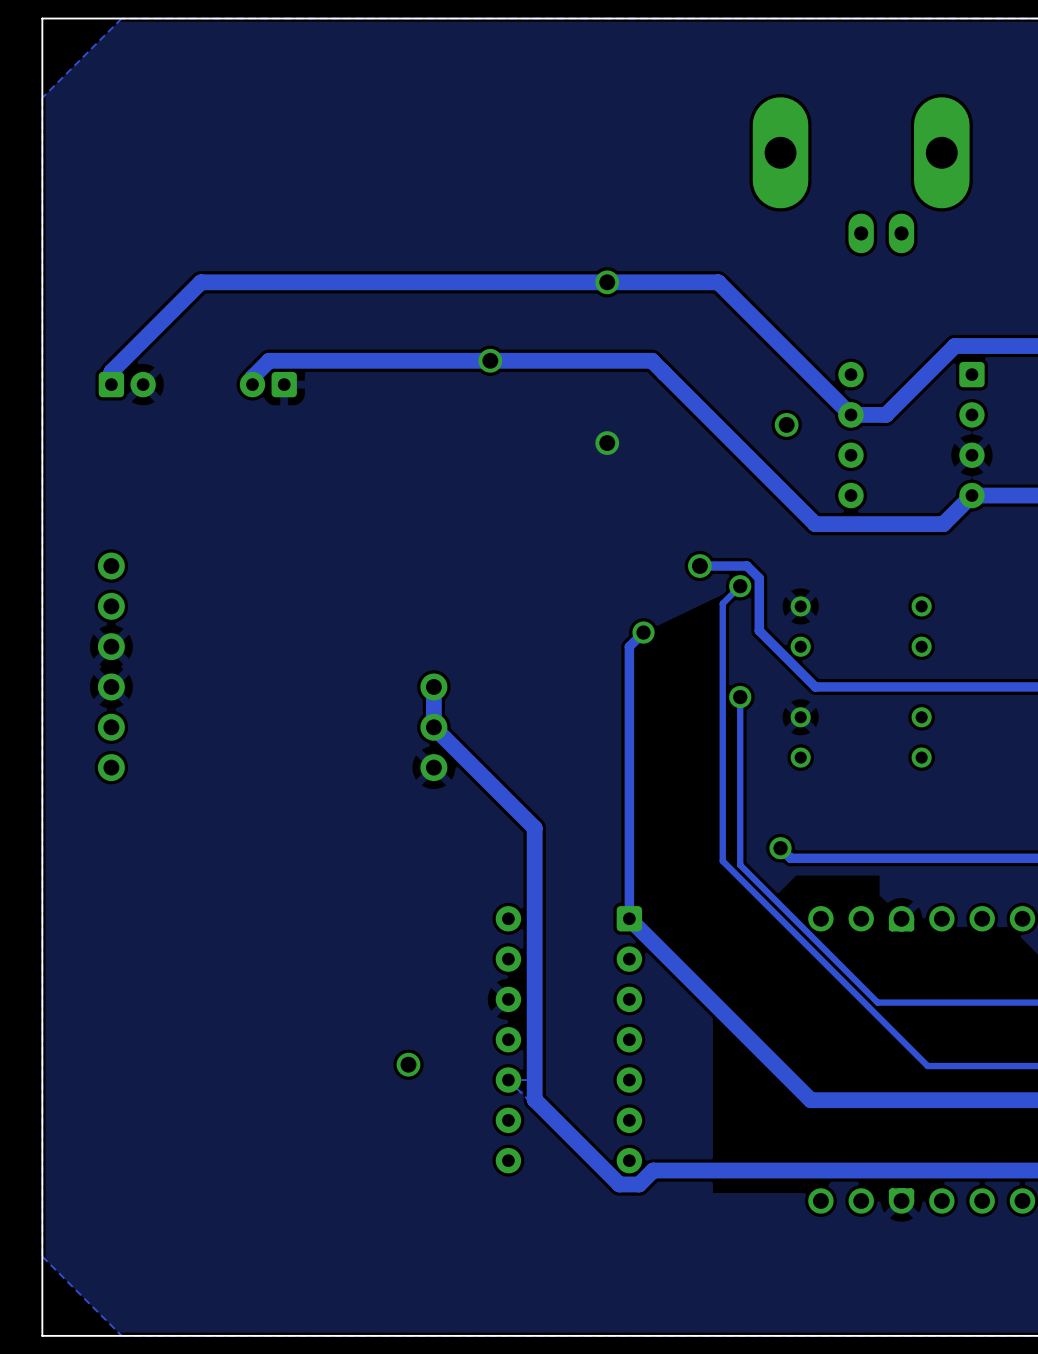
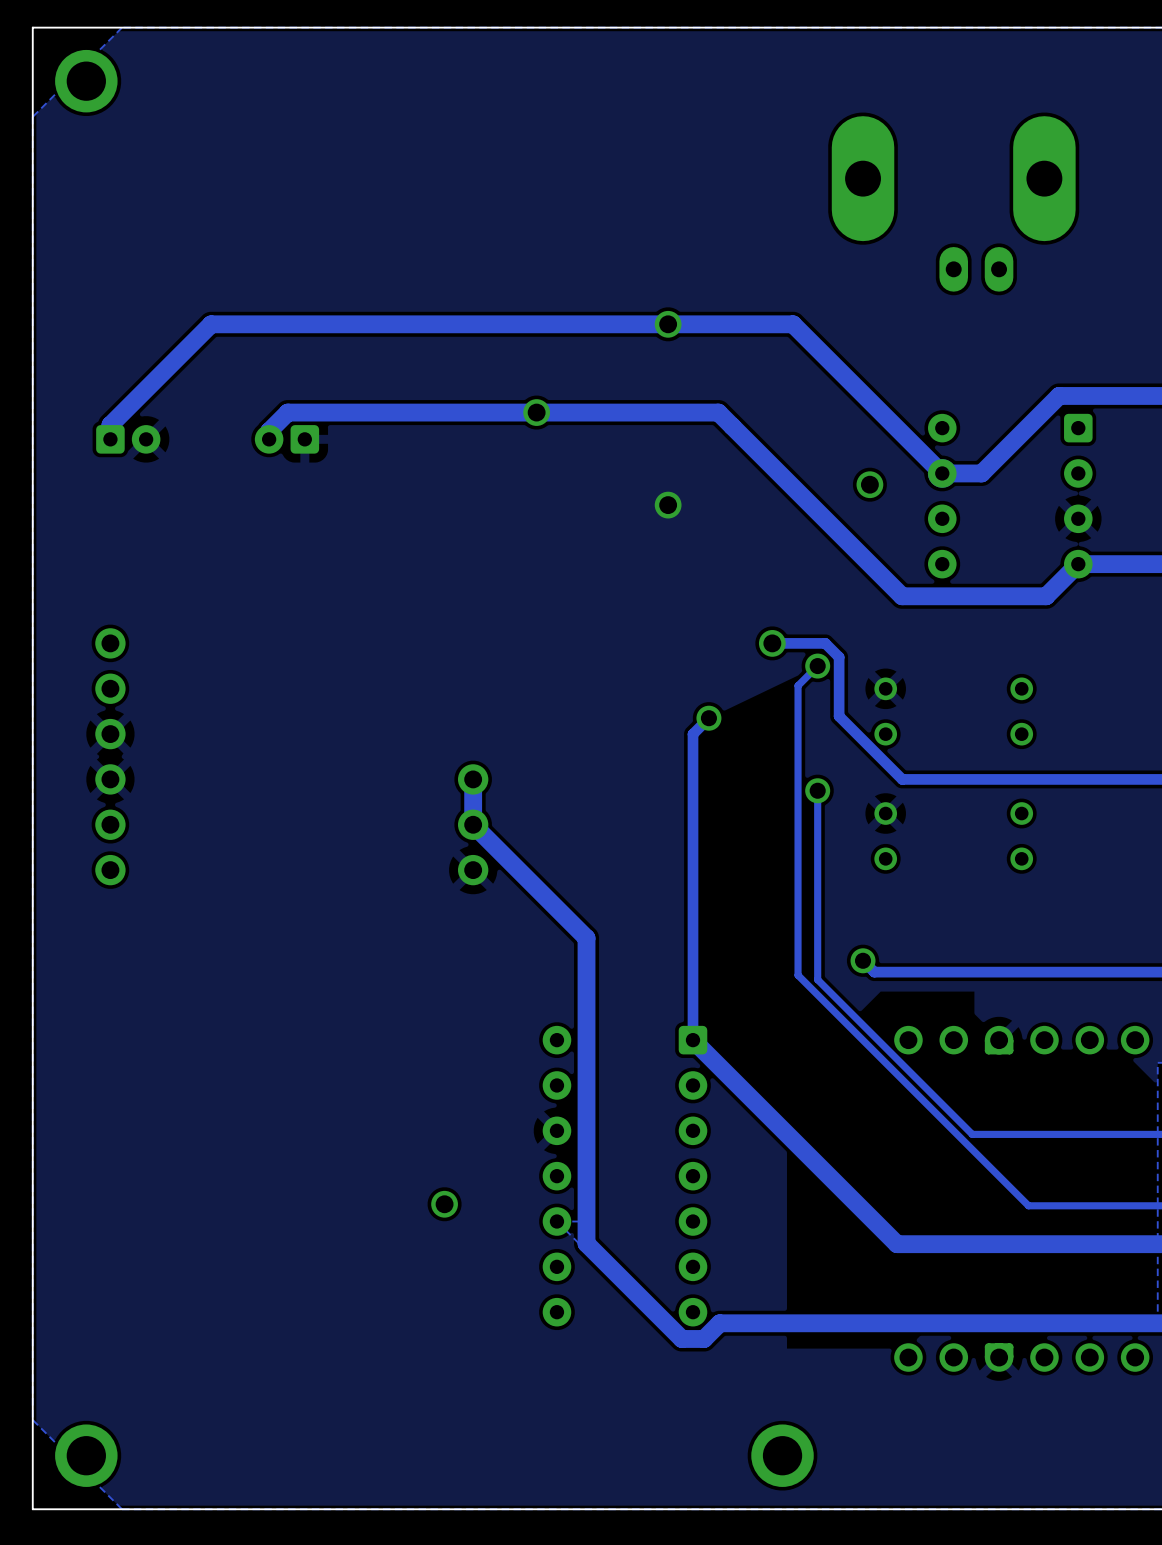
part: none -> (86, 81)
part: none -> (86, 1455)
part: none -> (782, 1455)

